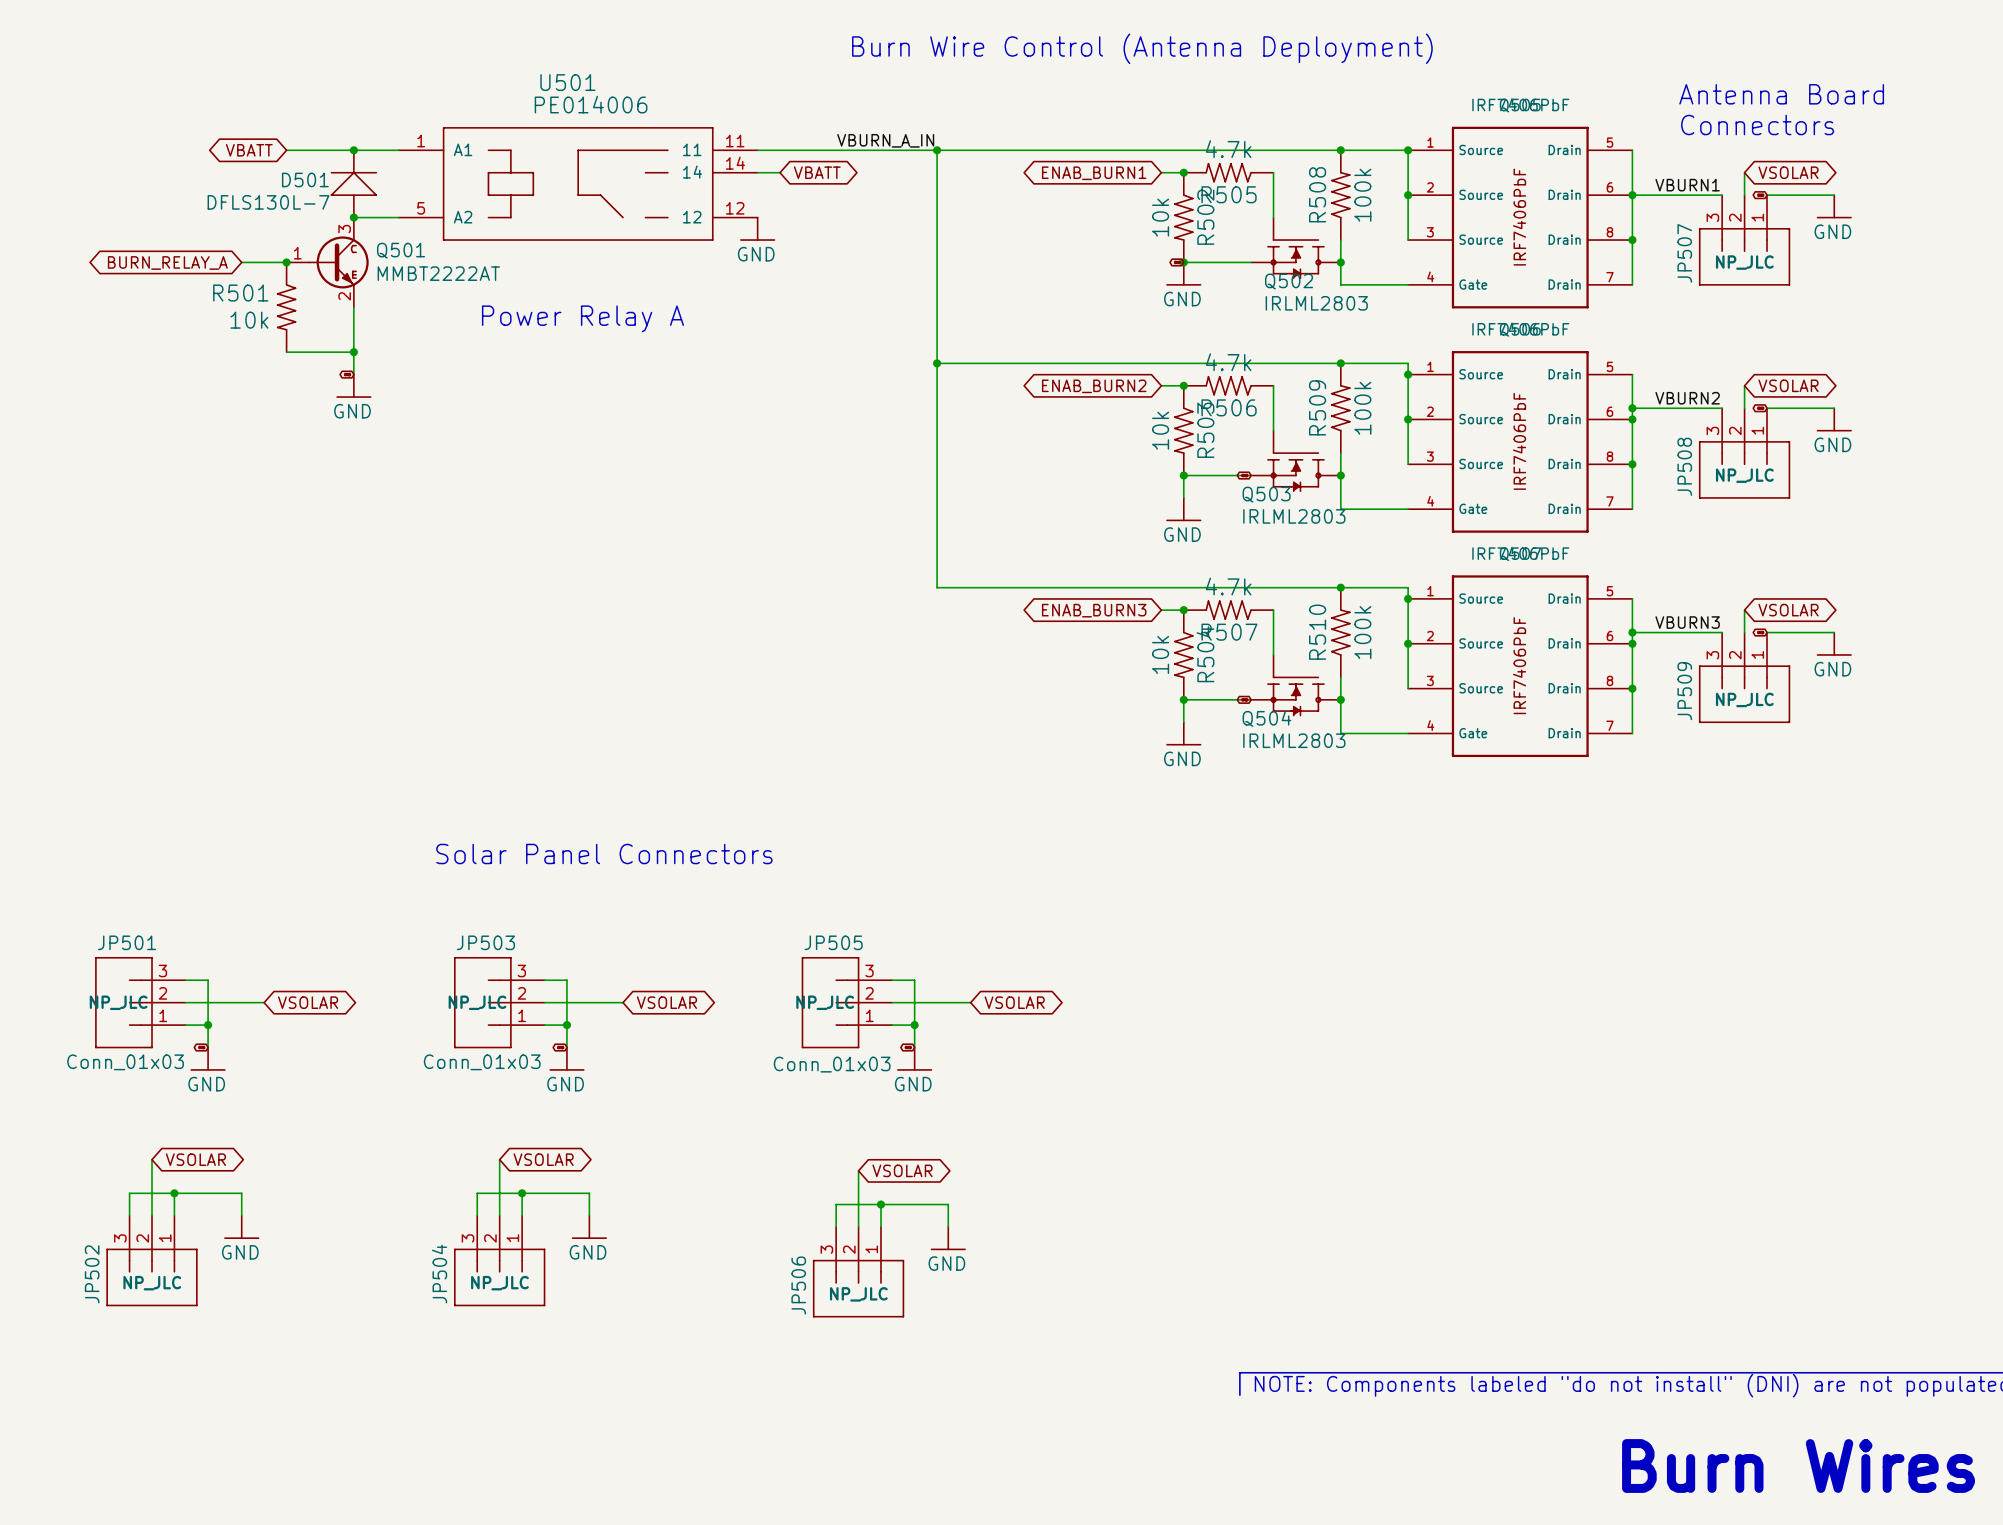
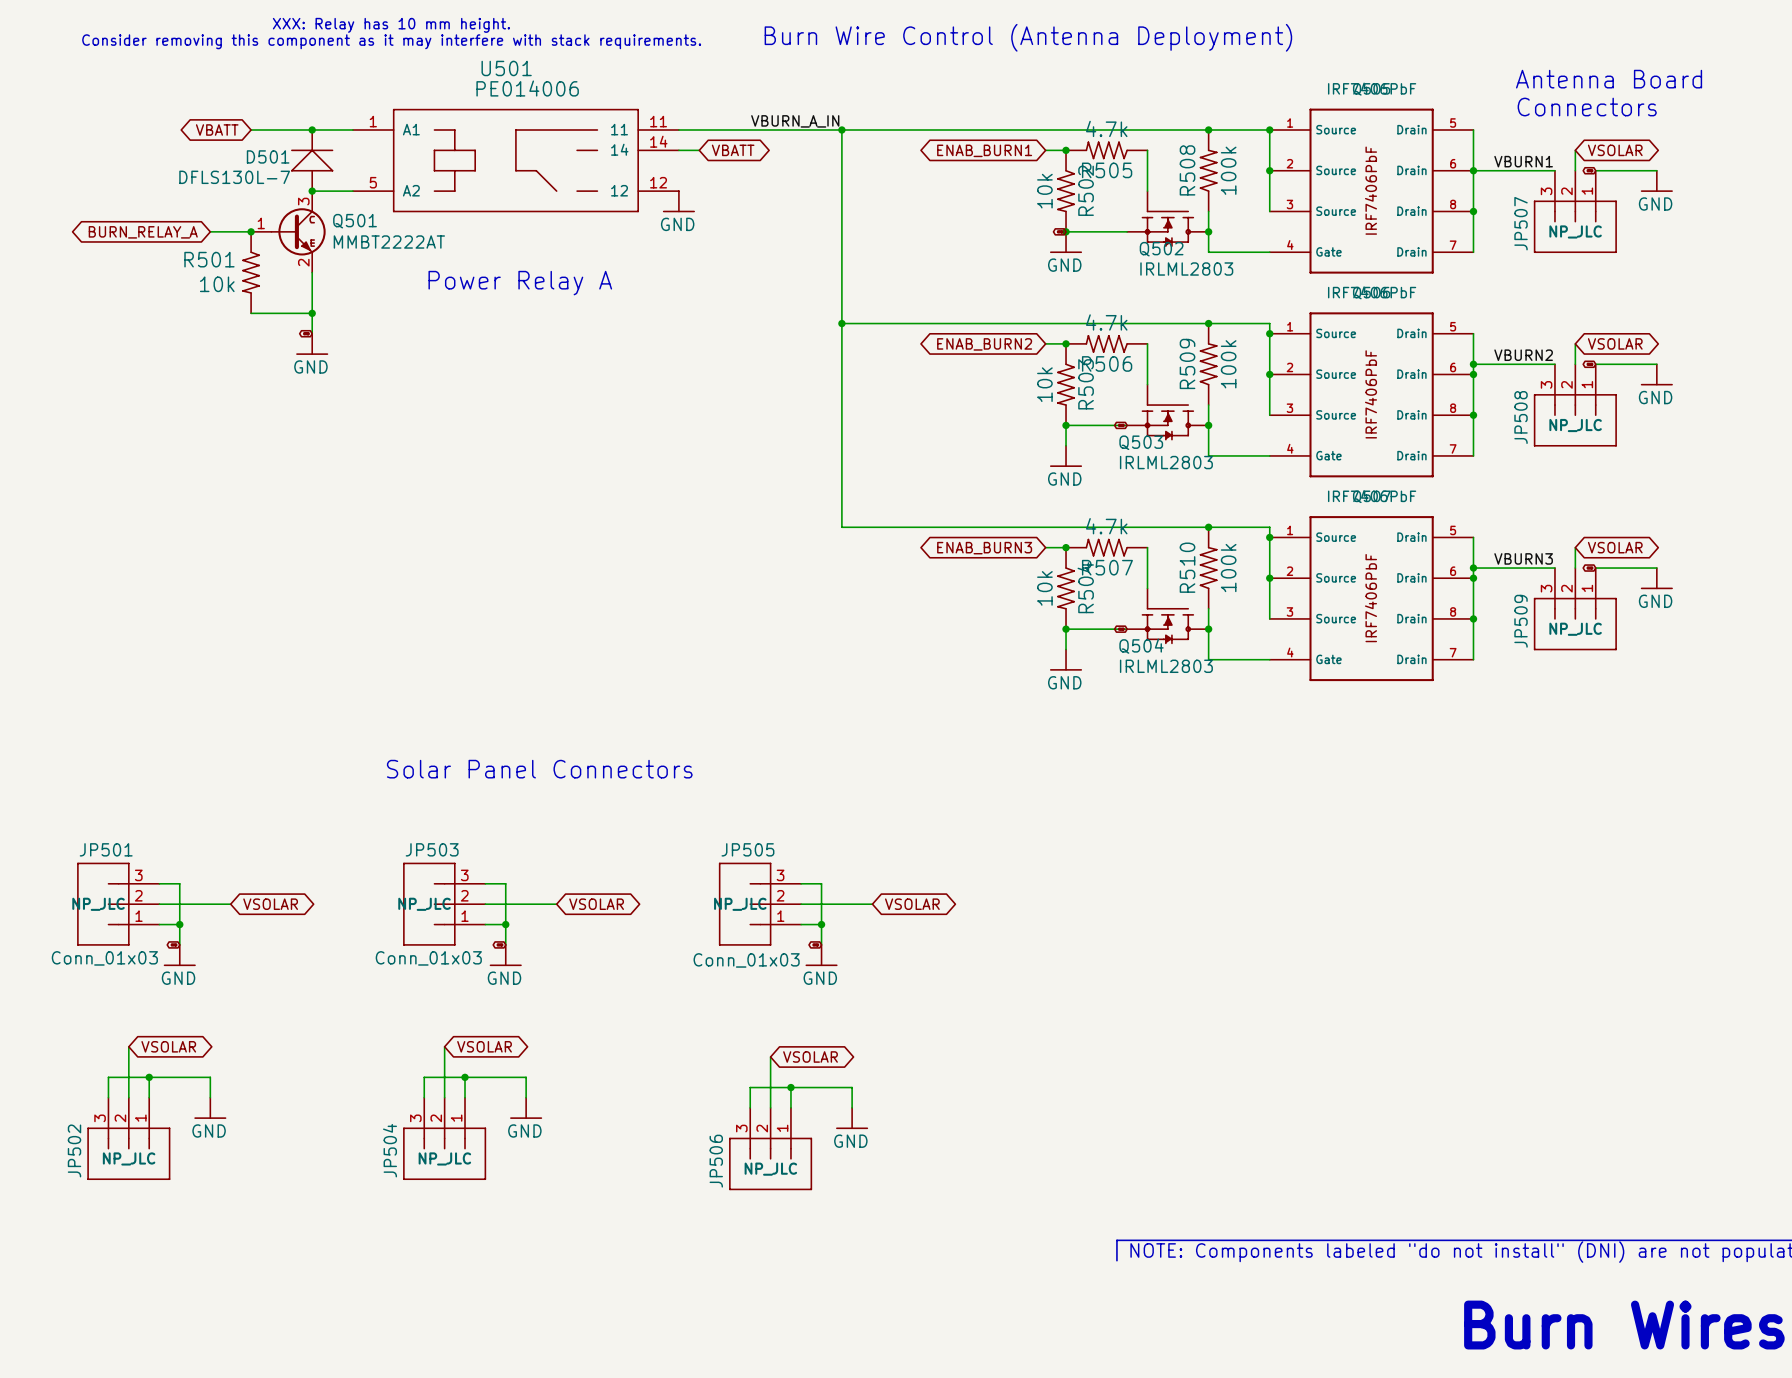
text: none -> XXX: Relay has 10 mm height. (391, 25)
text: none -> Consider removing this component as it may interfere with stack requirements. (391, 41)

